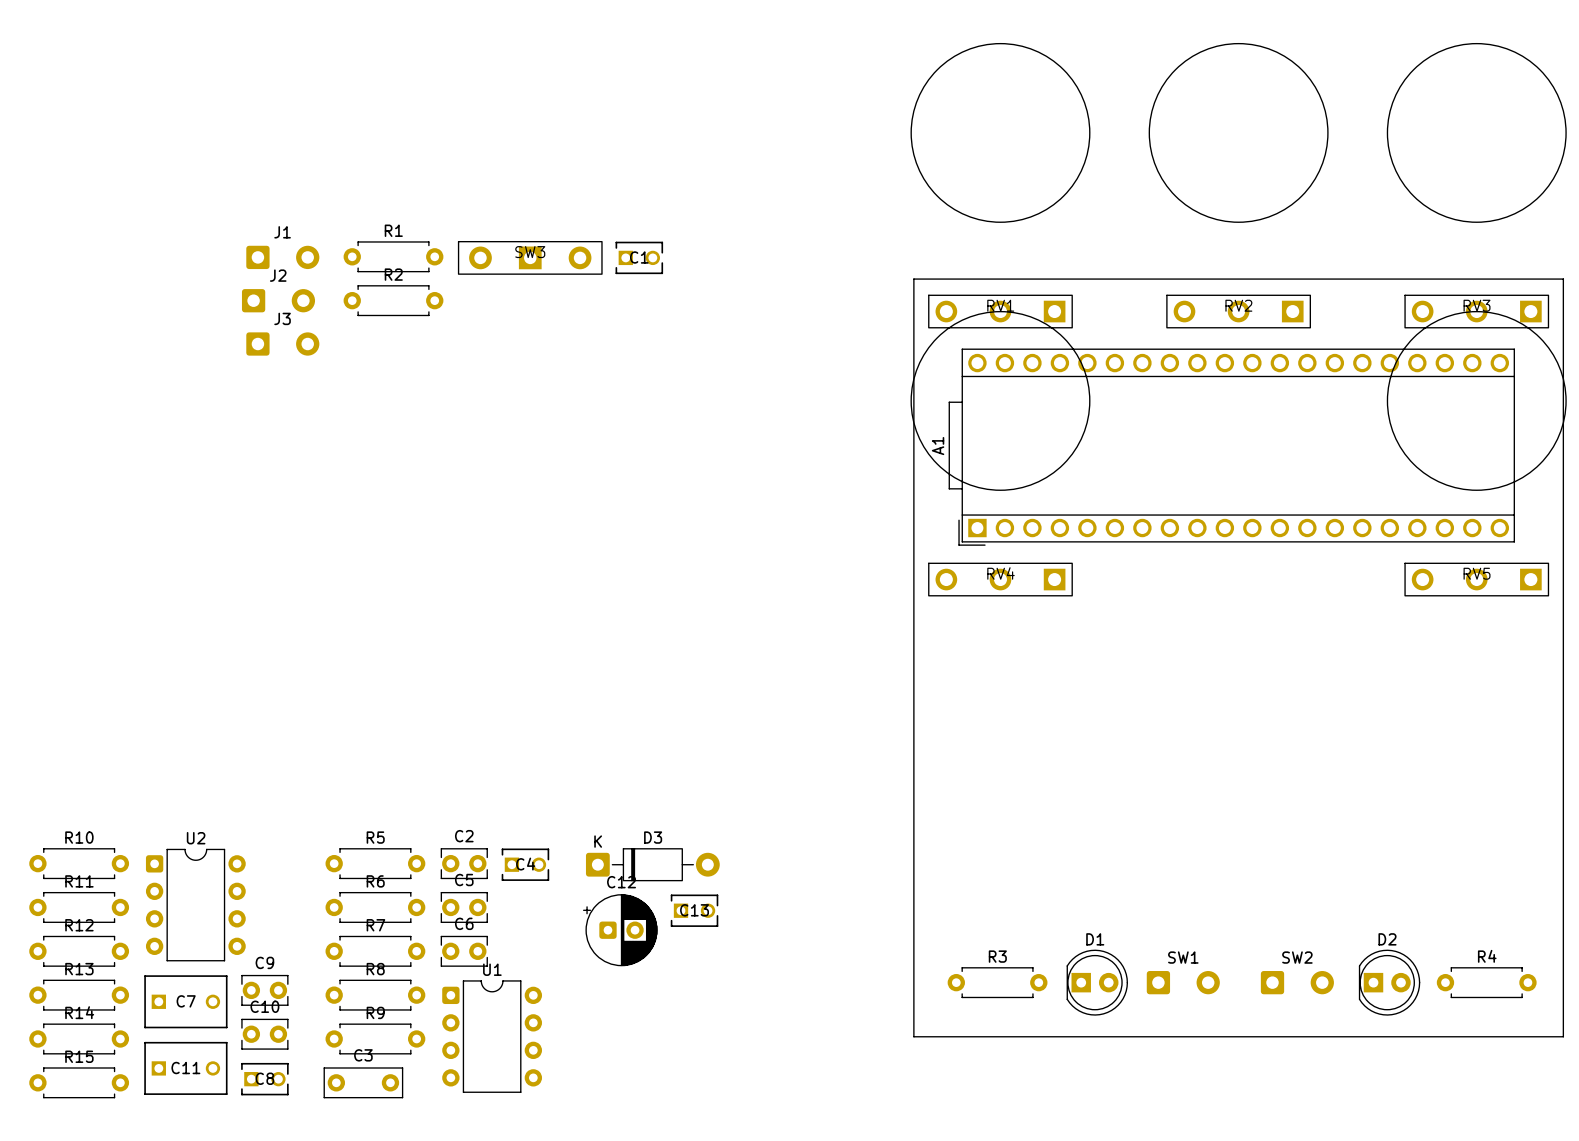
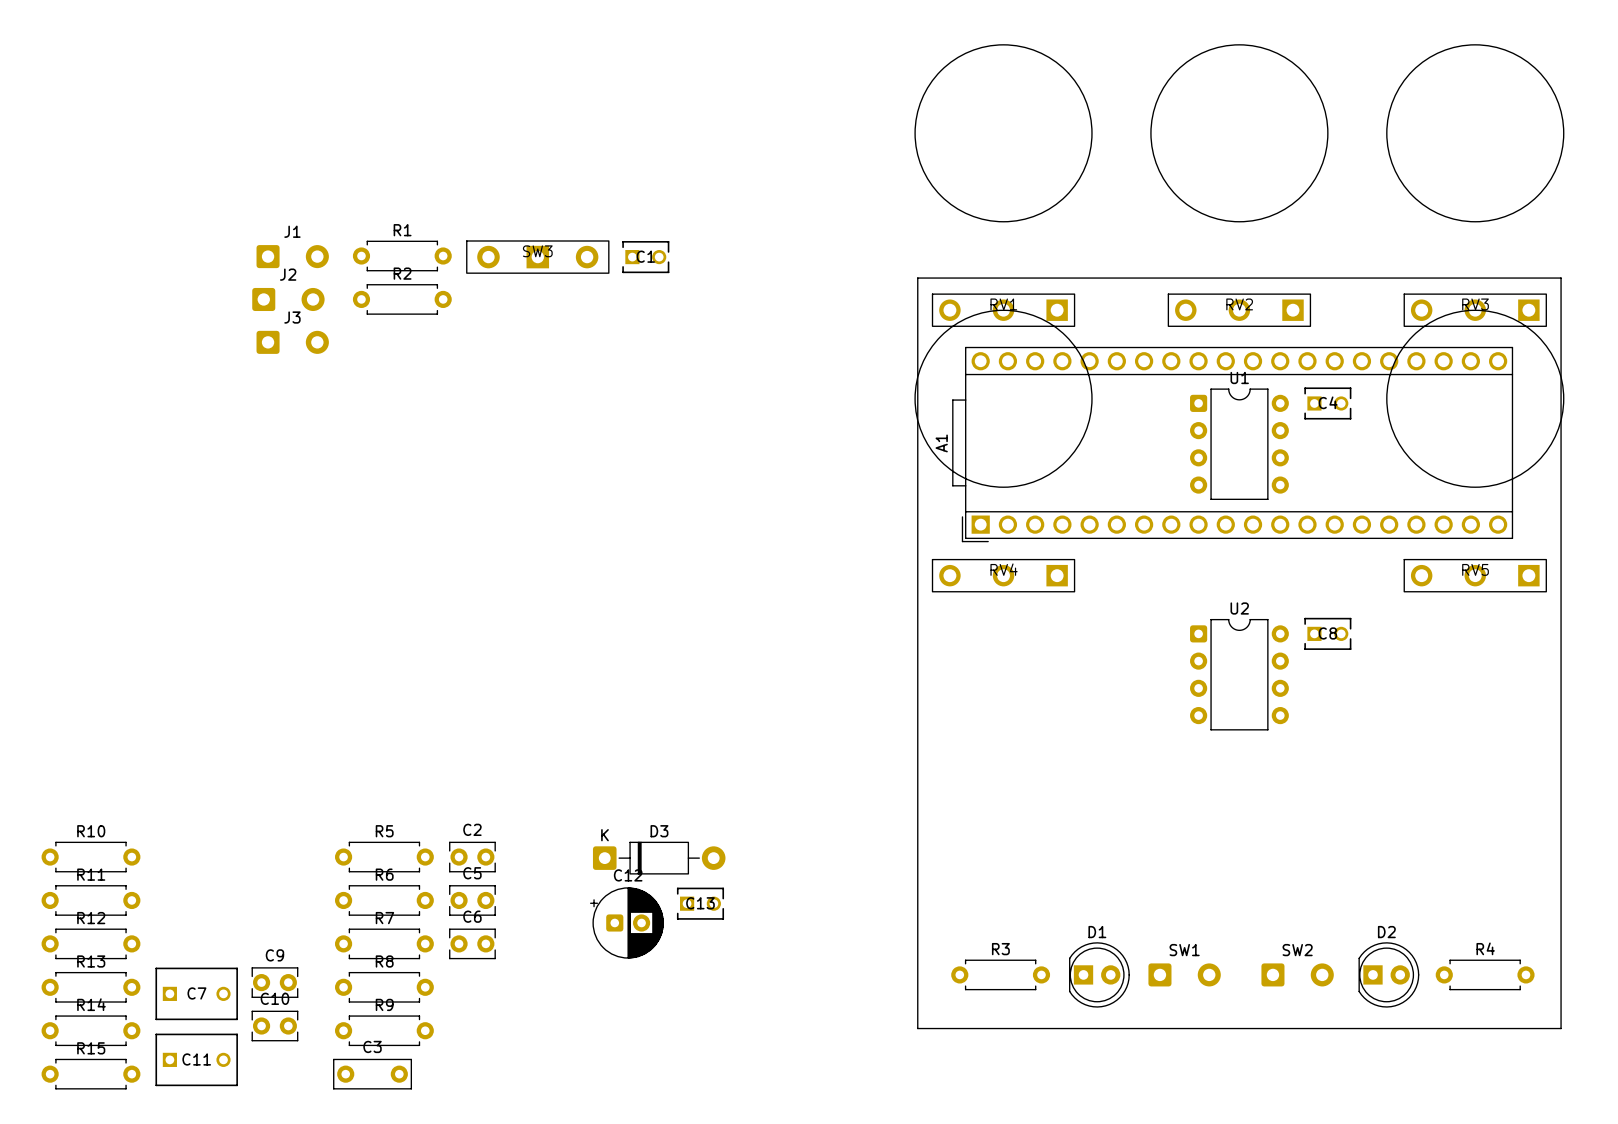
C4 position: (525, 864) -> (1327, 403)
U2 position: (195, 905) -> (1239, 674)
U1 position: (492, 1036) -> (1239, 444)
C8 position: (264, 1079) -> (1327, 633)

